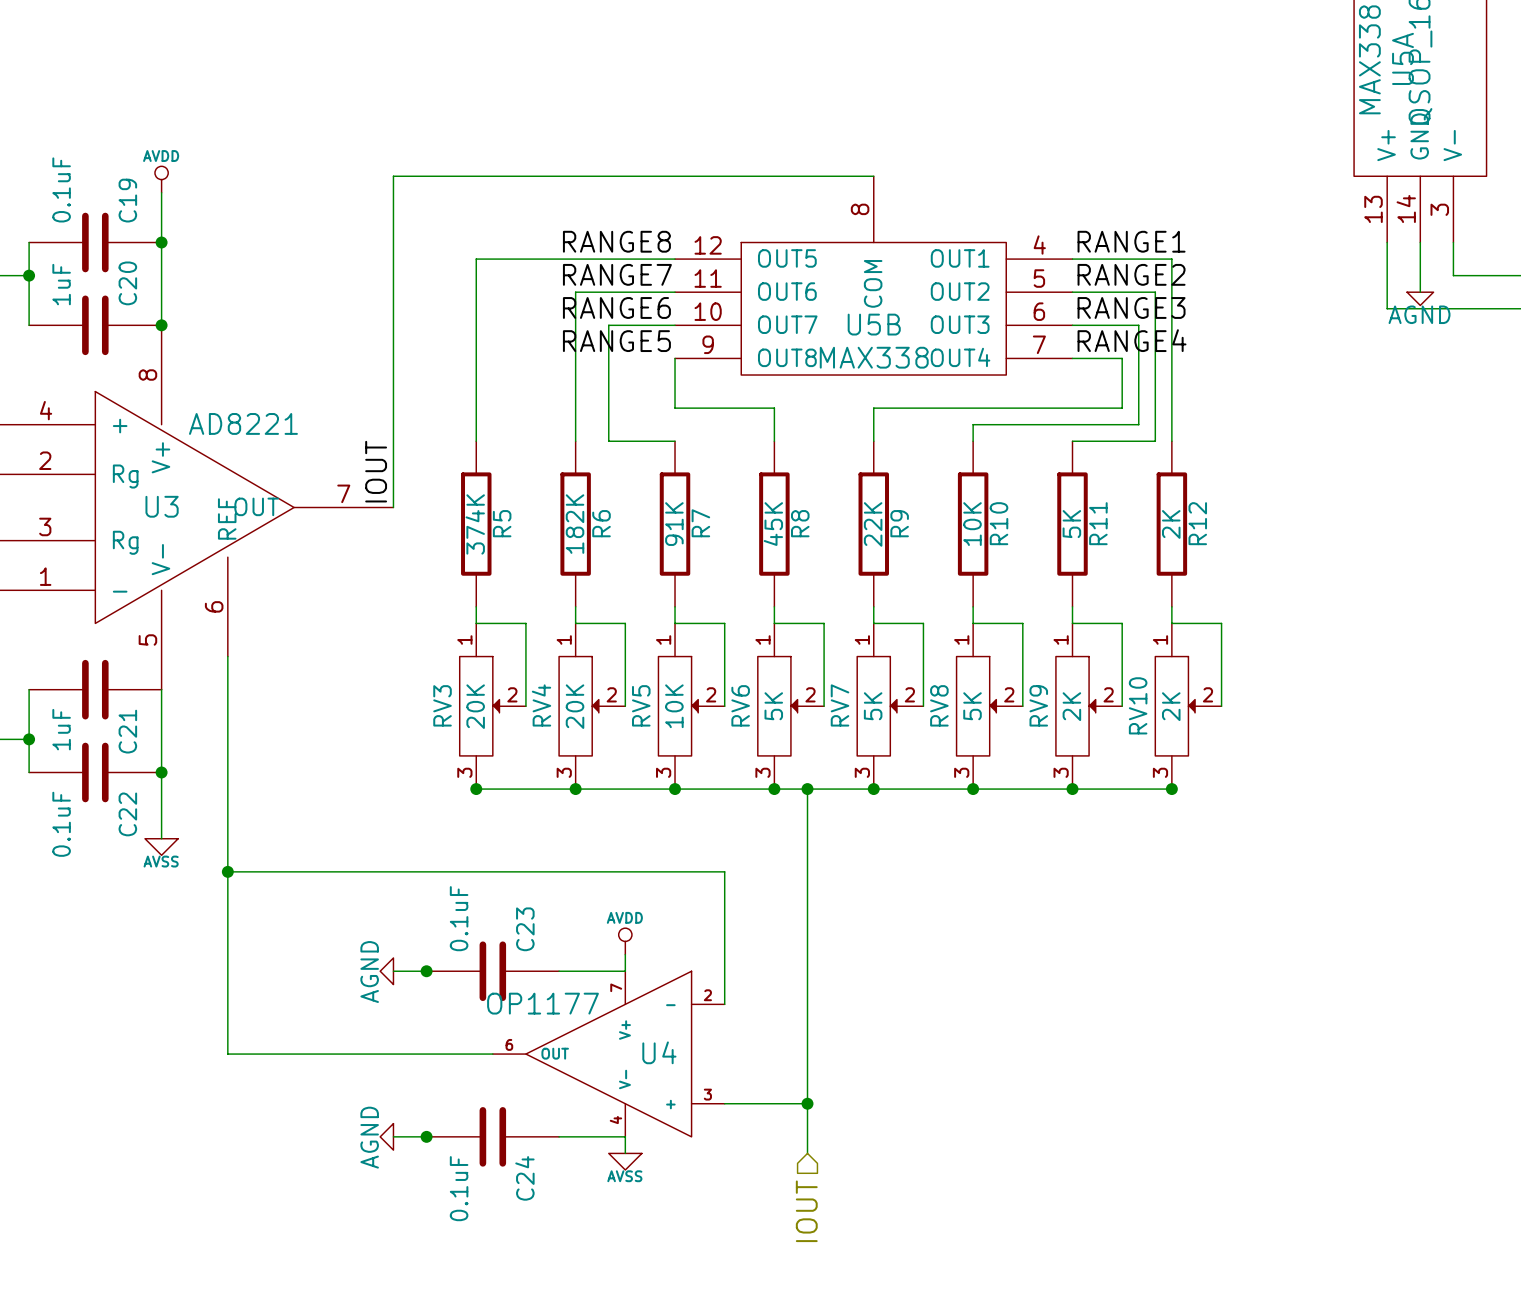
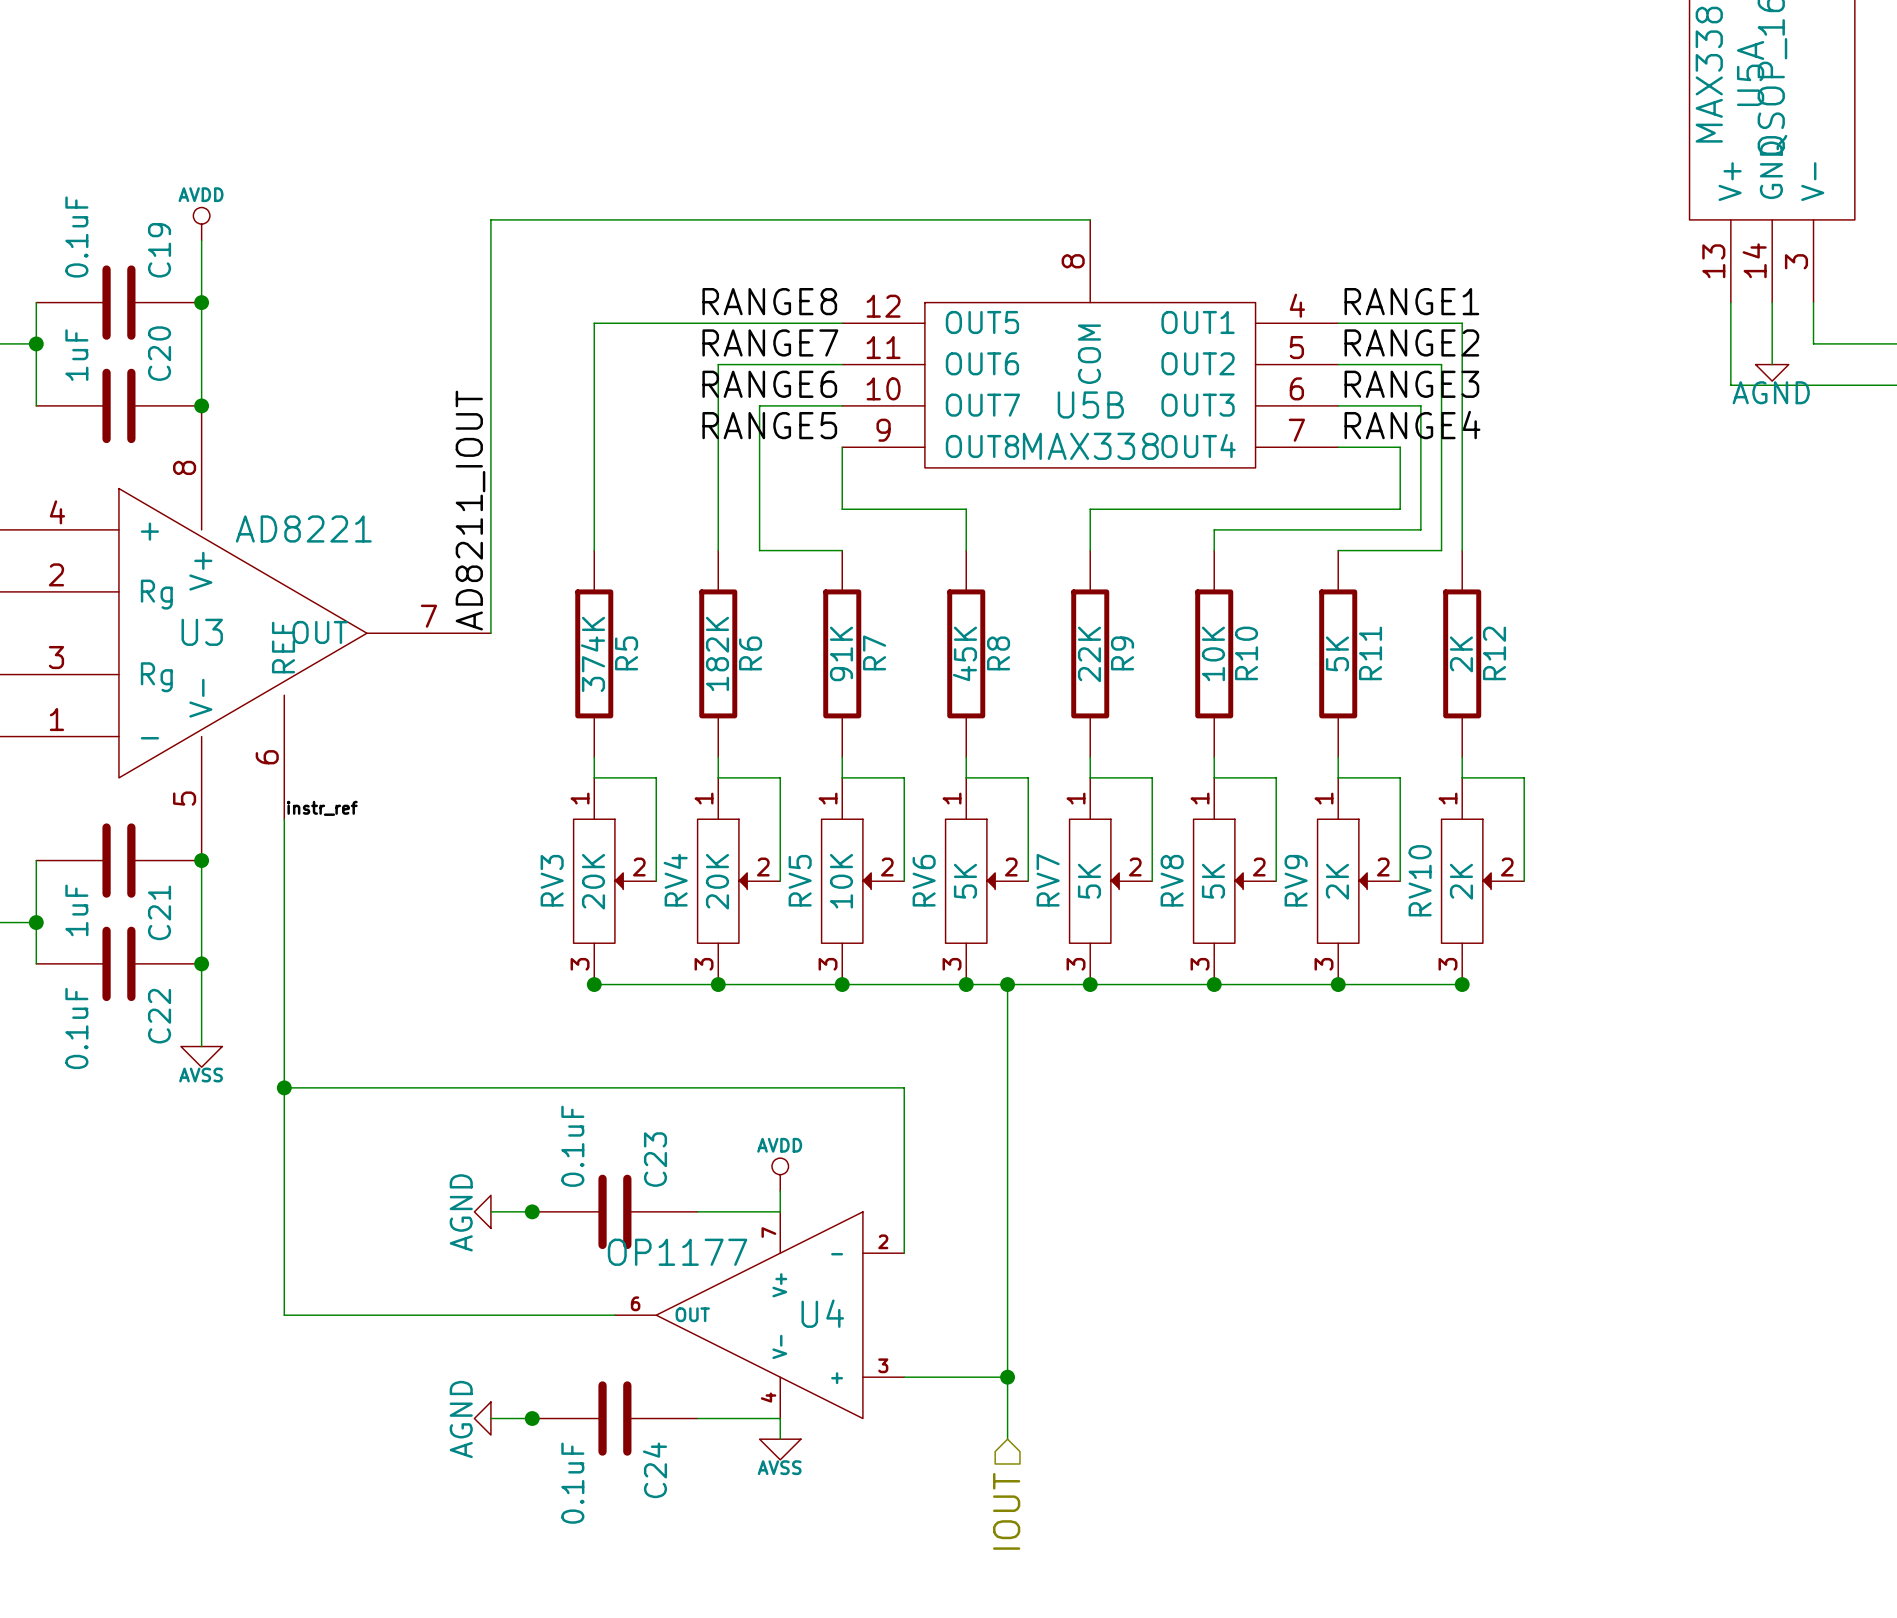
label: IOUT (376, 471) -> AD8211_IOUT (470, 510)
label: none -> instr_ref (322, 808)
junction: none -> (201, 860)

